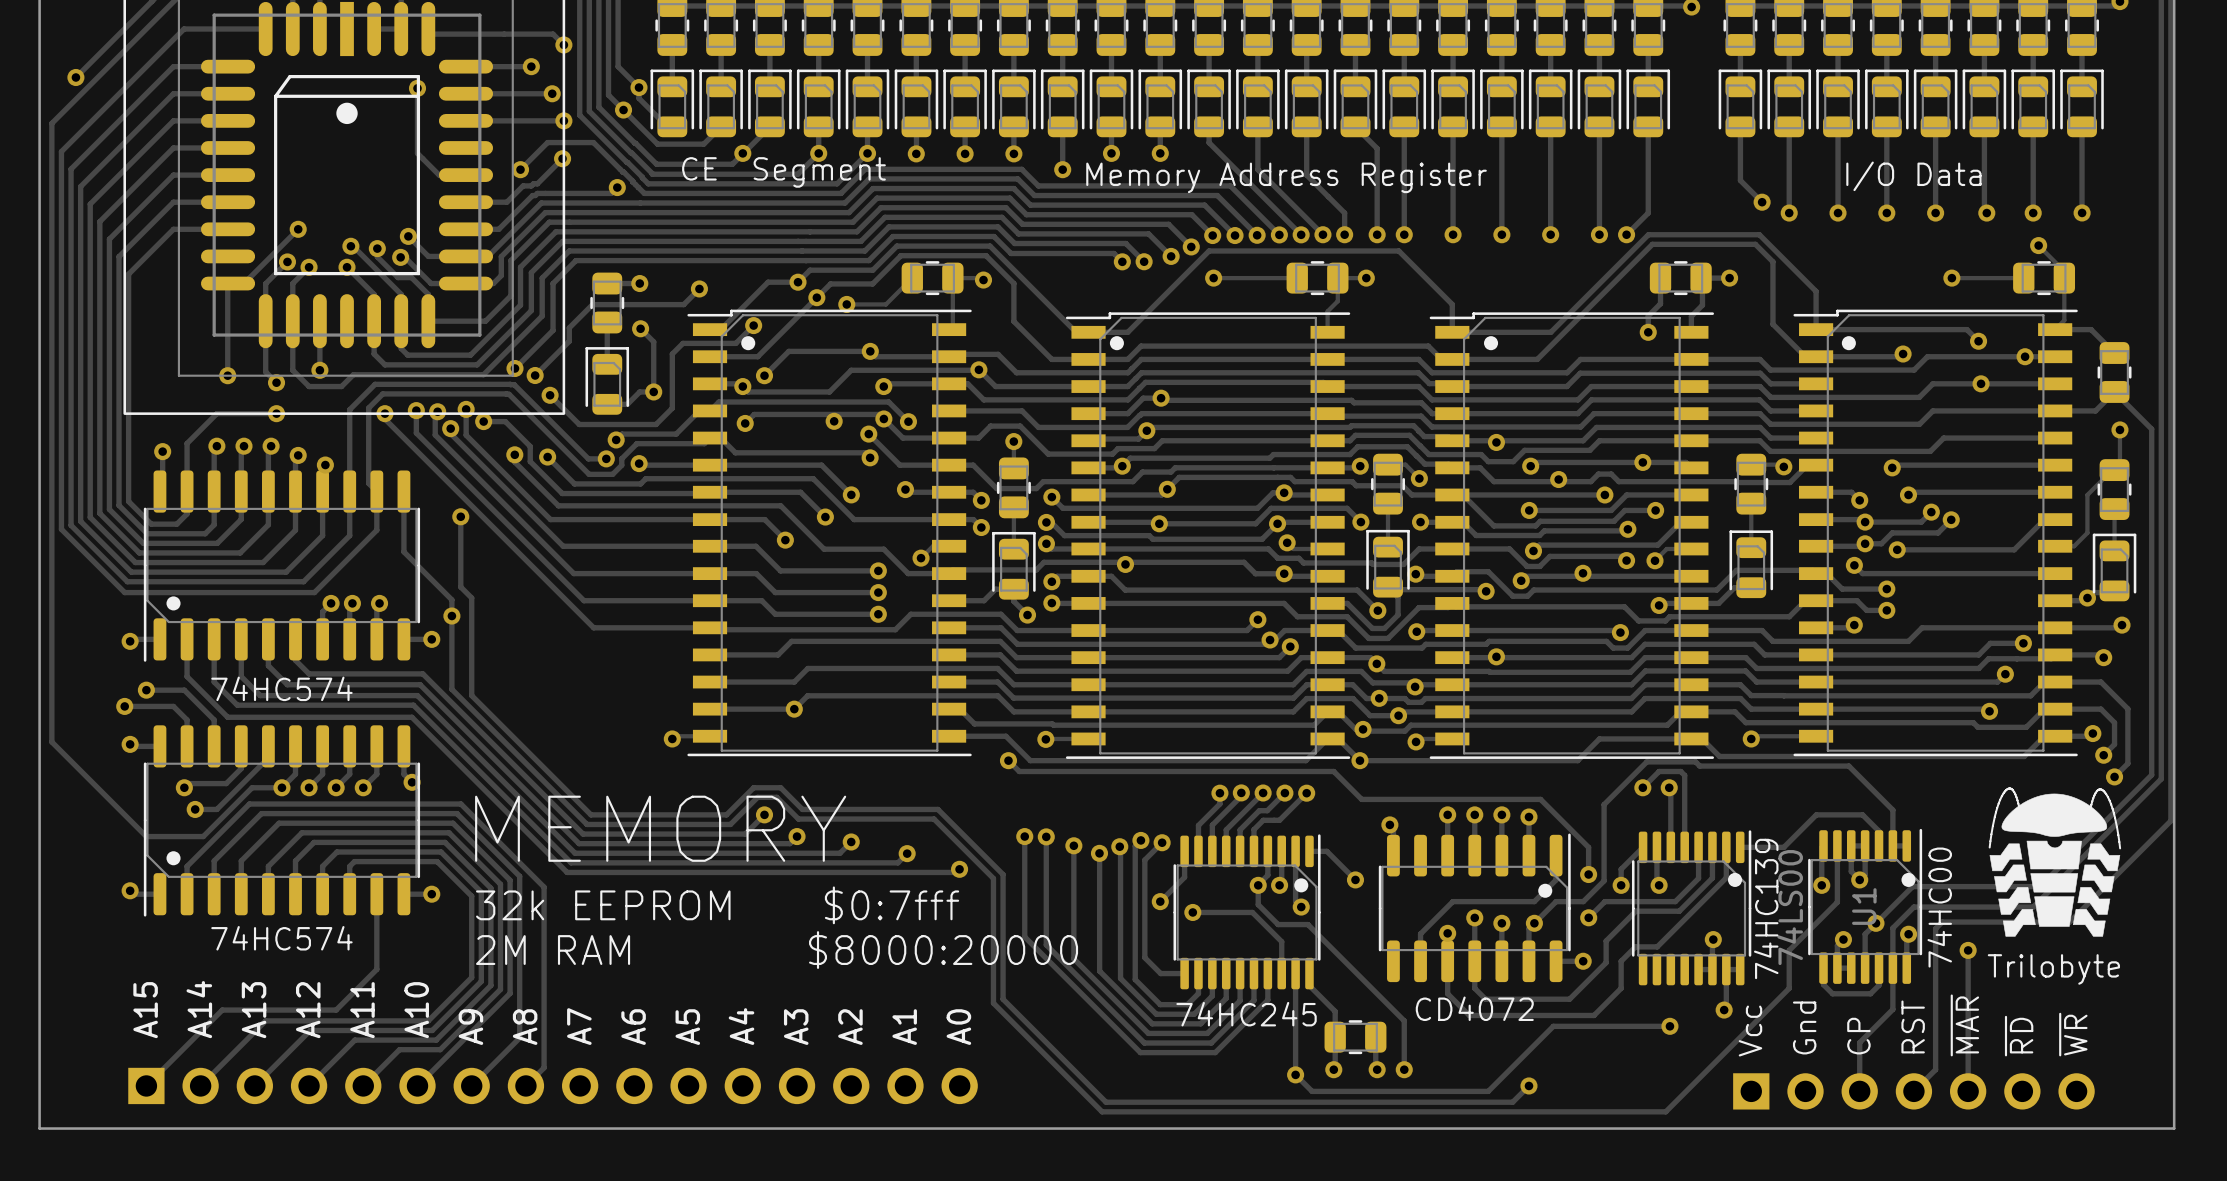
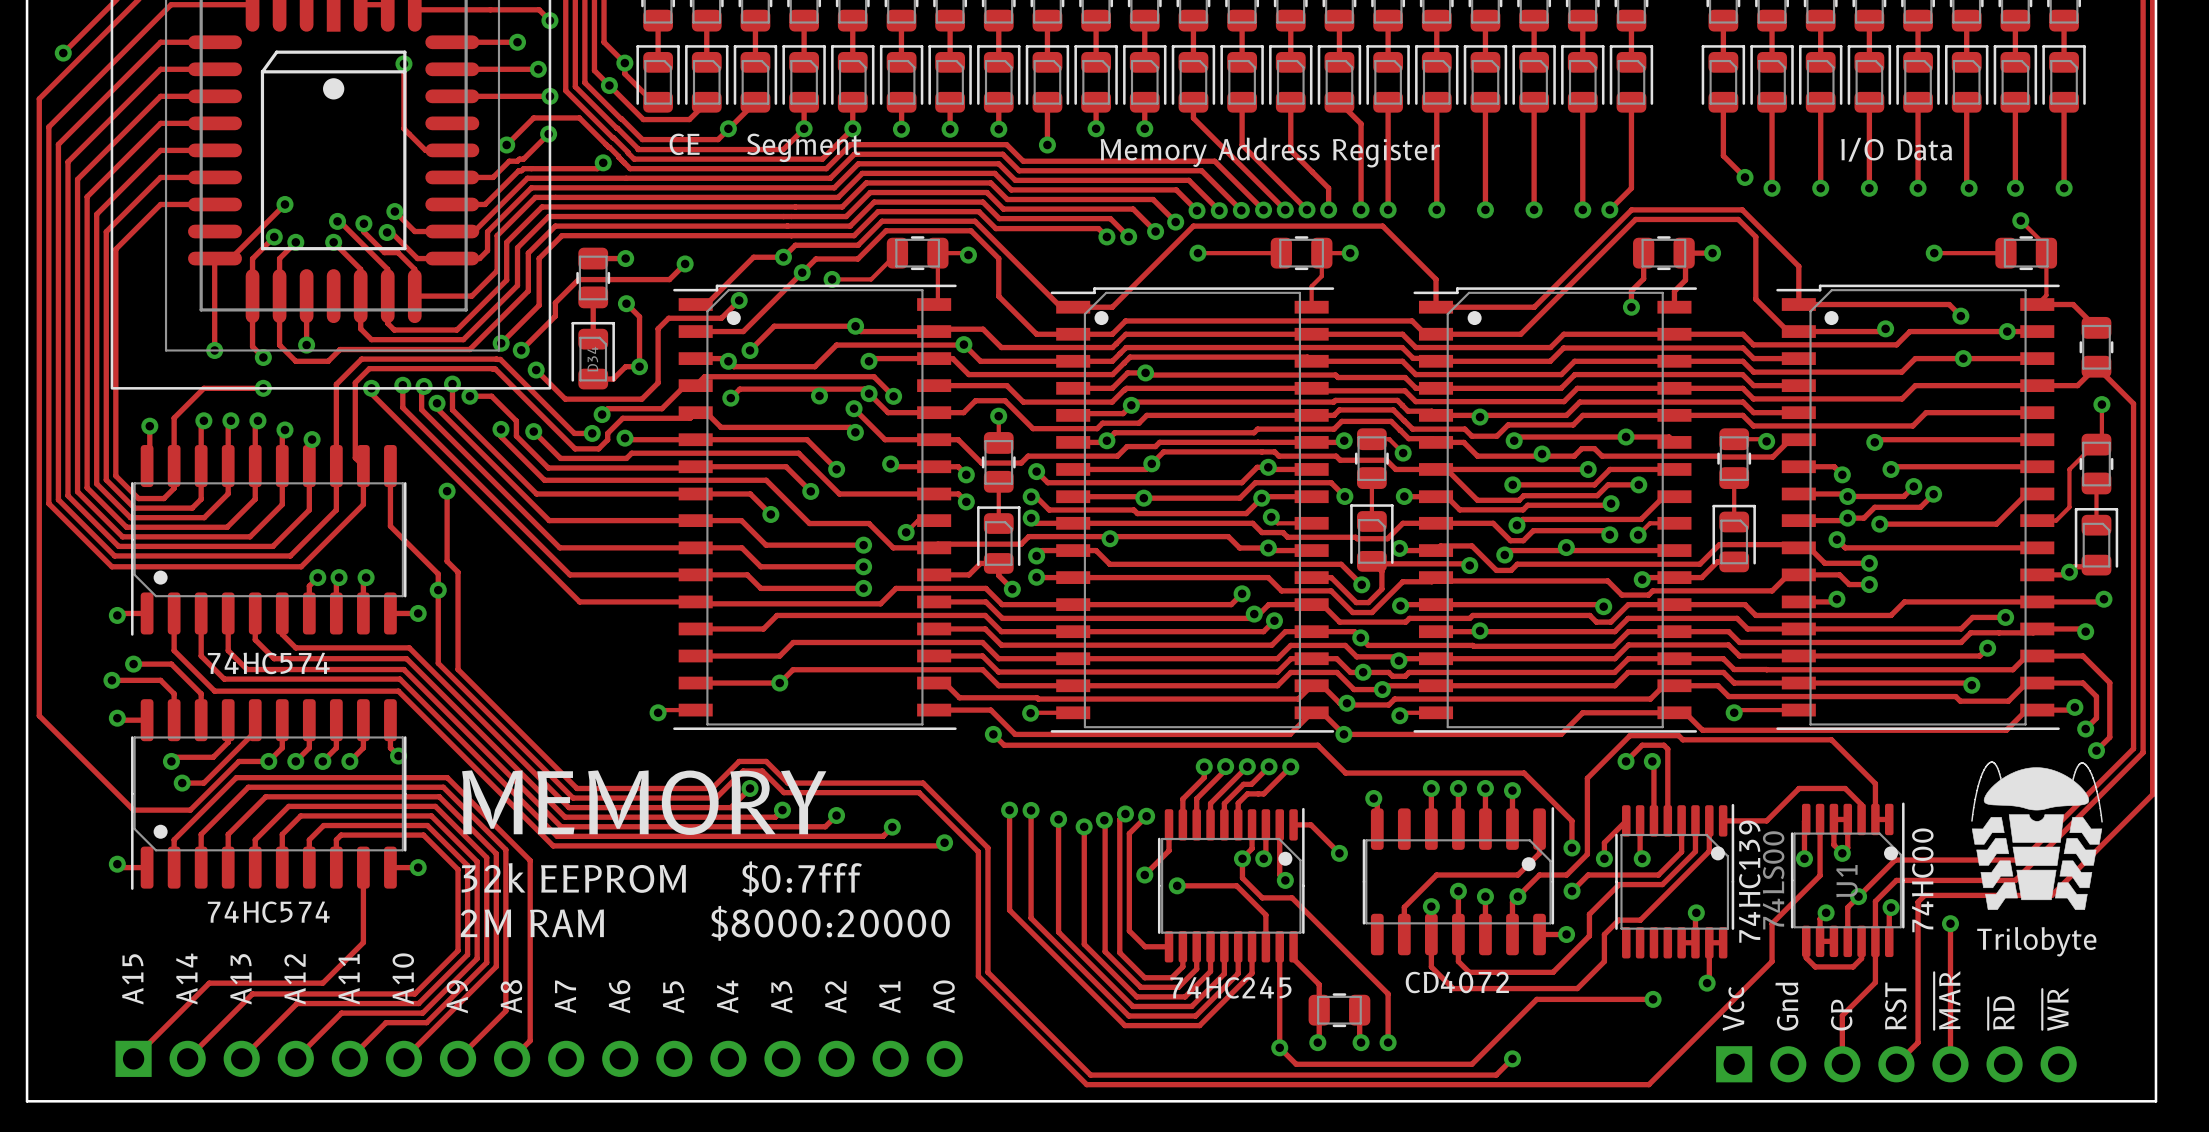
D34 name: none -> D34 (592, 359)

